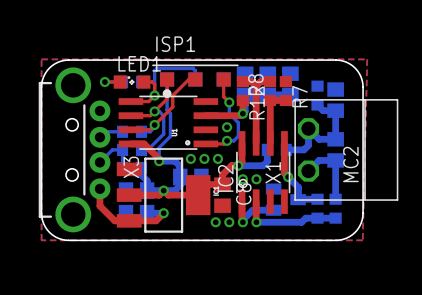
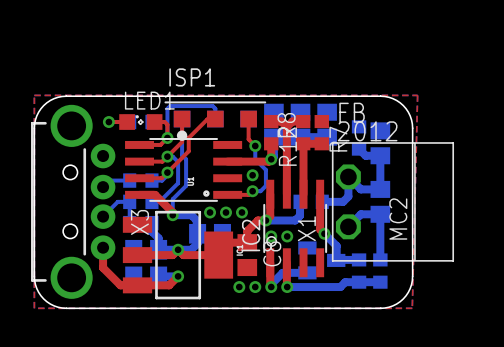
text: none -> FB (352, 112)
text: none -> 2012 (367, 131)

